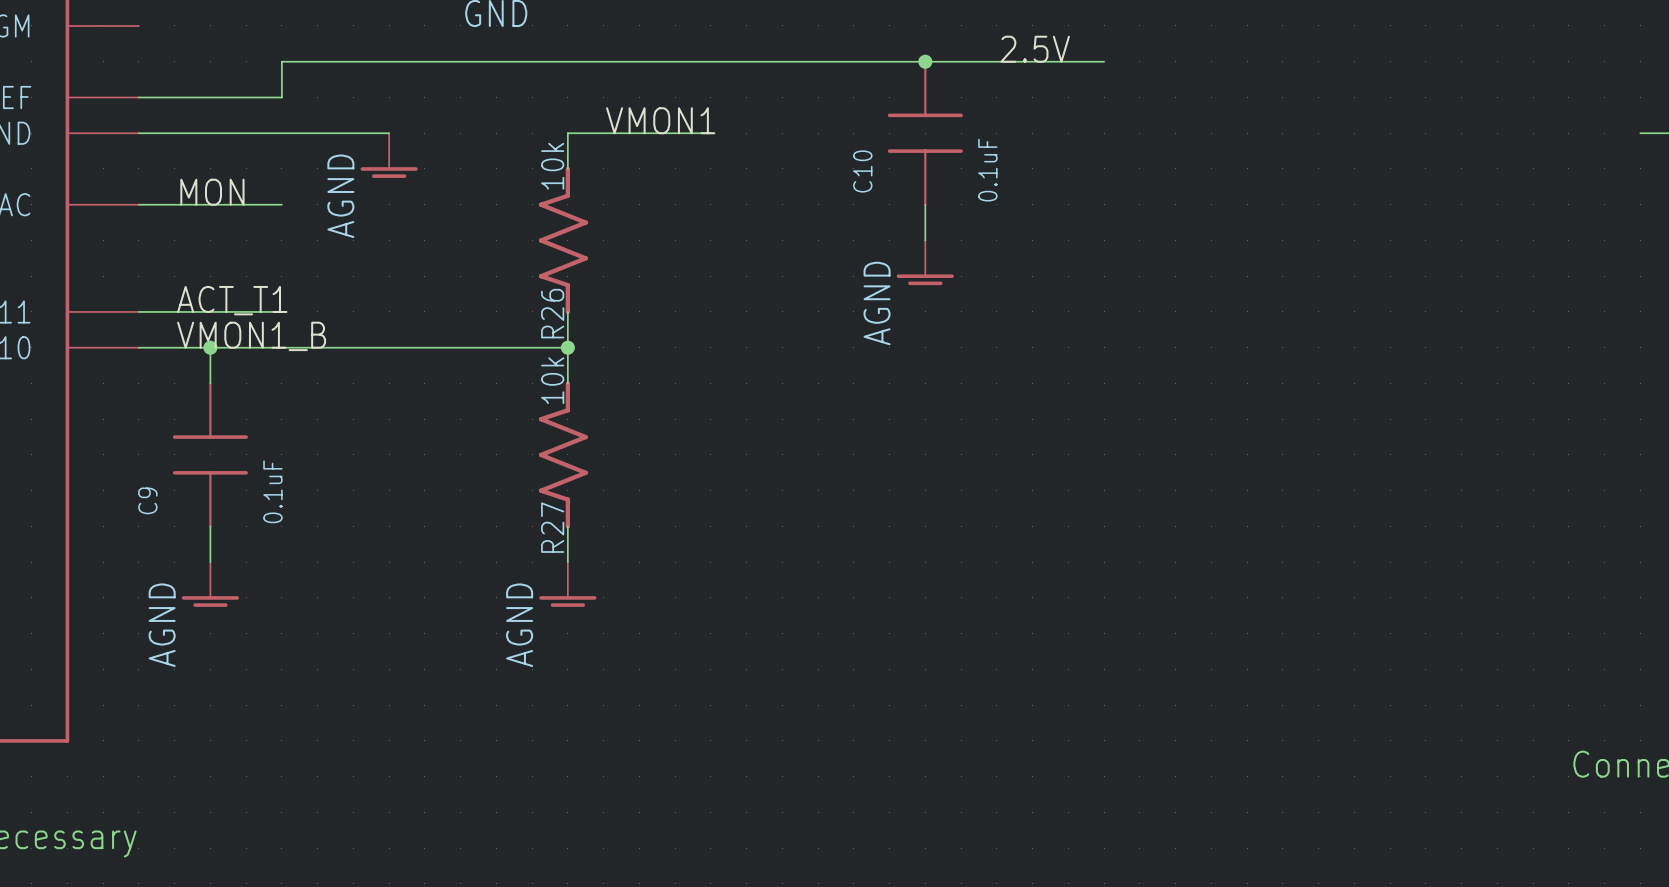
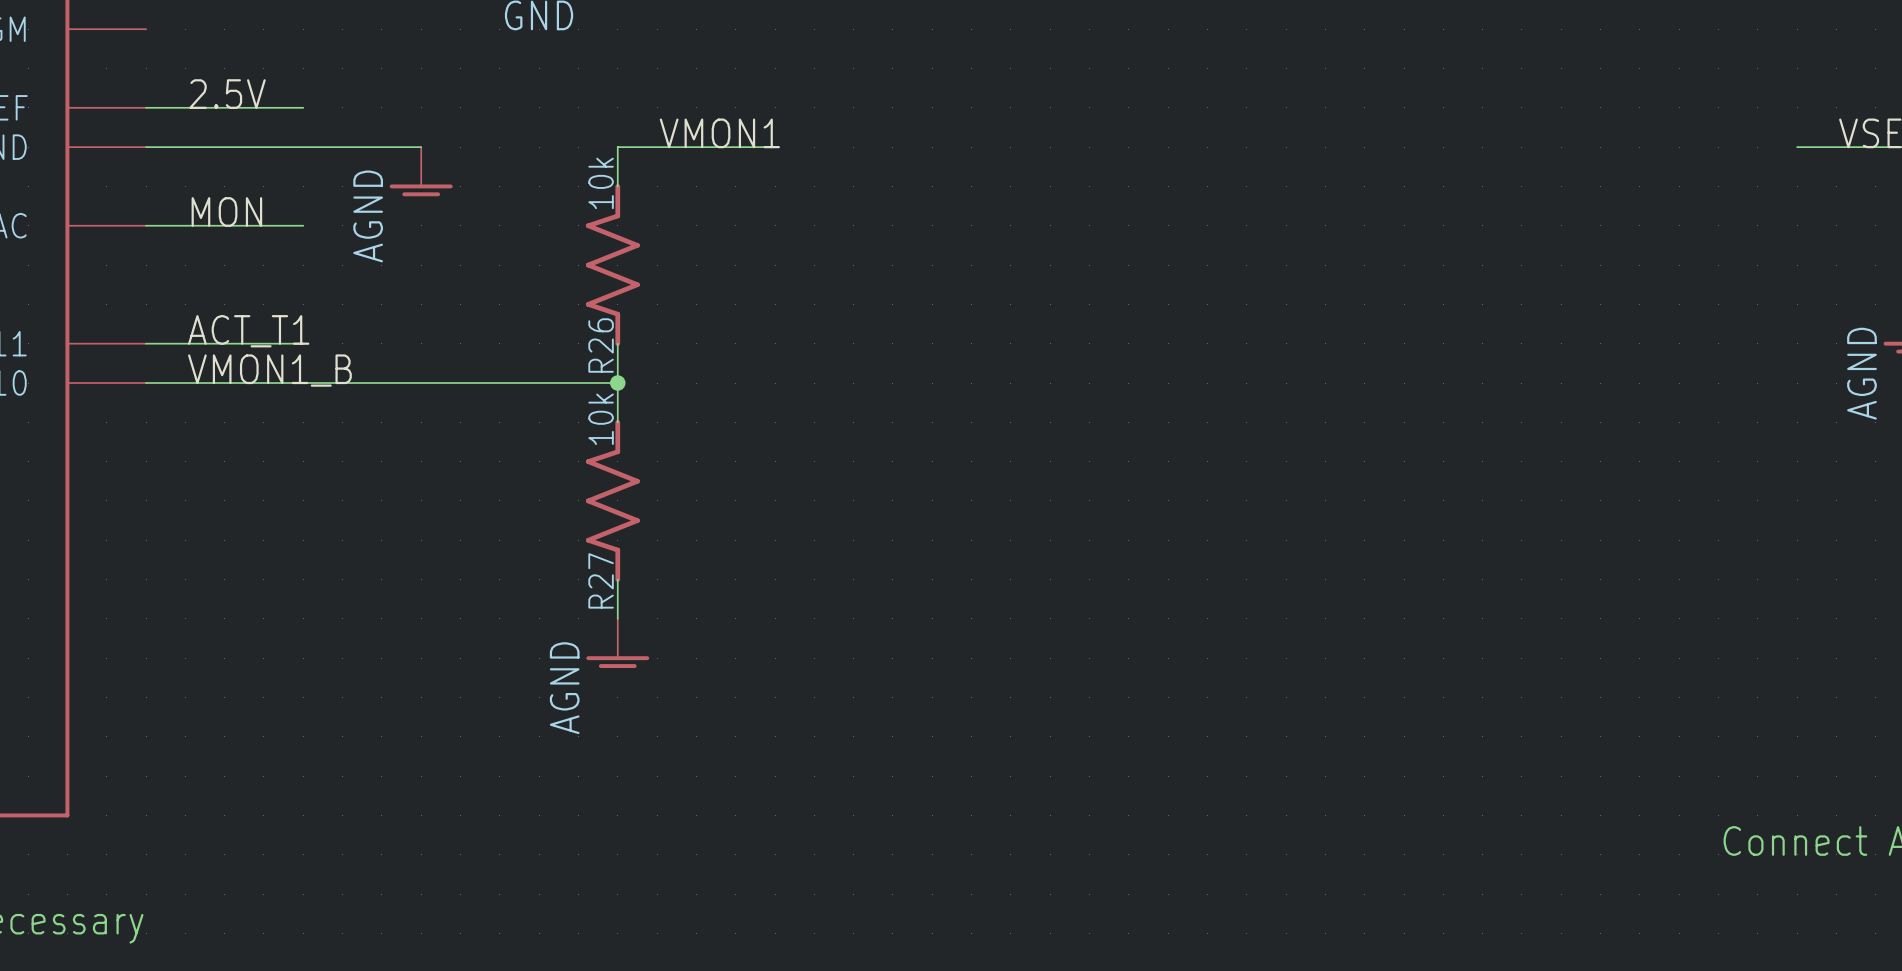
label: 2.5V (1035, 49) -> none
junction: (925, 61) -> none
wire: (1104, 61) (281, 61) (281, 97) -> none
label: none -> 2.5V (227, 94)
C10: 0.1uF (925, 133) -> none
wire: (925, 204) (925, 240) -> none
power symbol: AGND (925, 262) -> none
wire: (210, 347) (210, 383) -> none
junction: (210, 347) -> none
C9: 0.1uF (210, 454) -> none
wire: (210, 526) (210, 562) -> none
power symbol: AGND (210, 584) -> none

